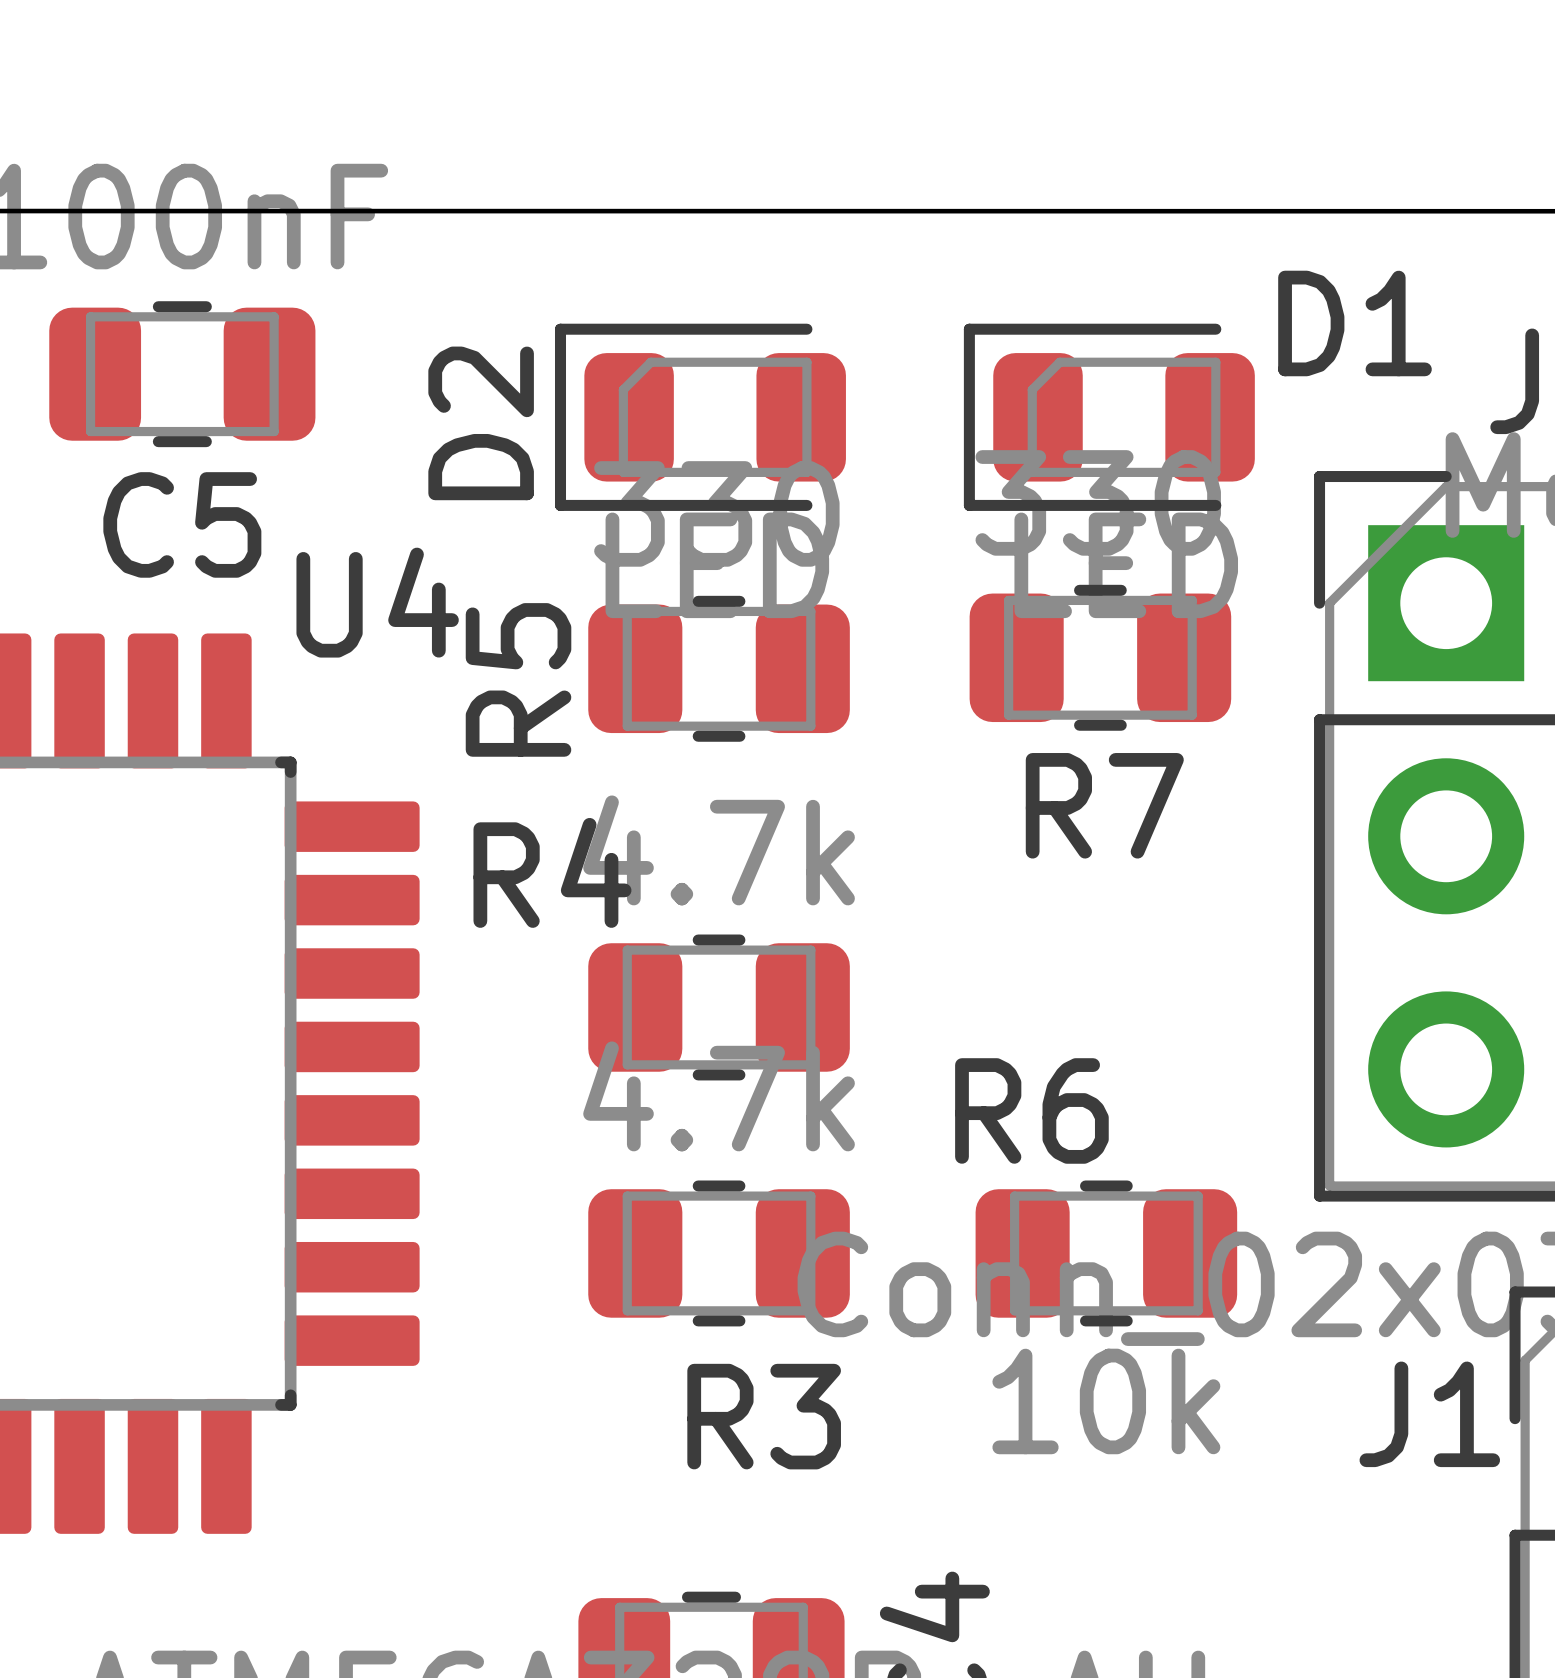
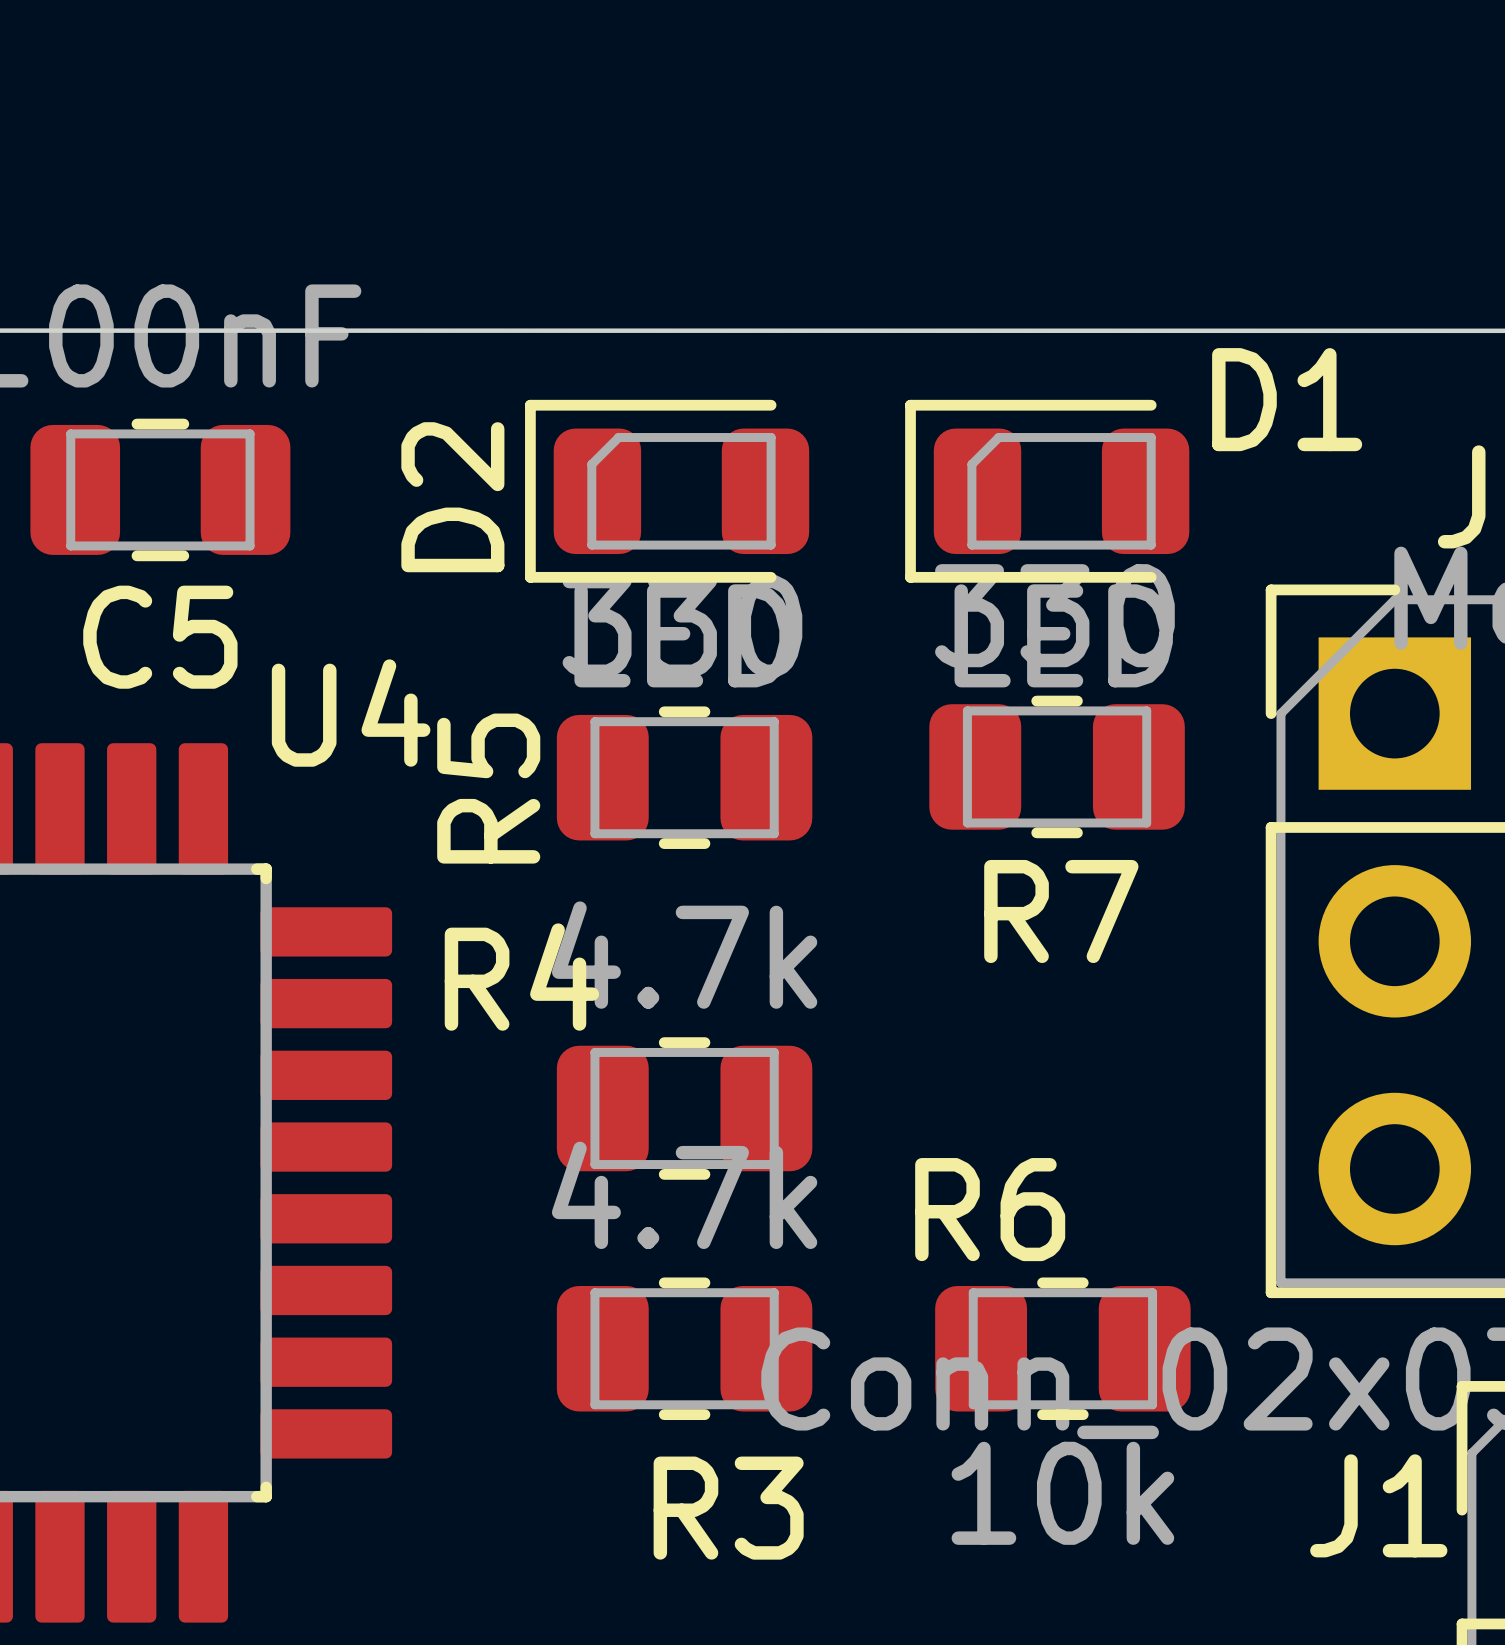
D2 position: (700, 417) -> (667, 491)
D1 position: (1109, 417) -> (1047, 491)

